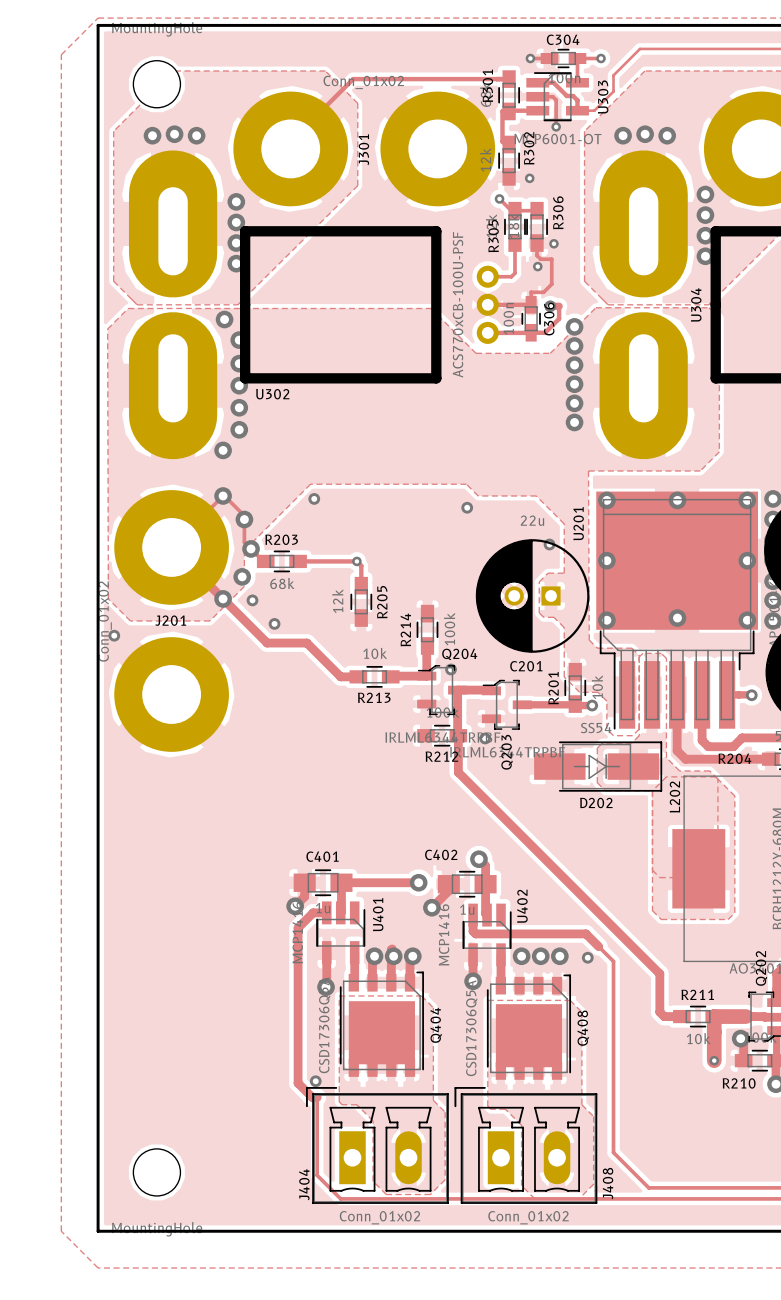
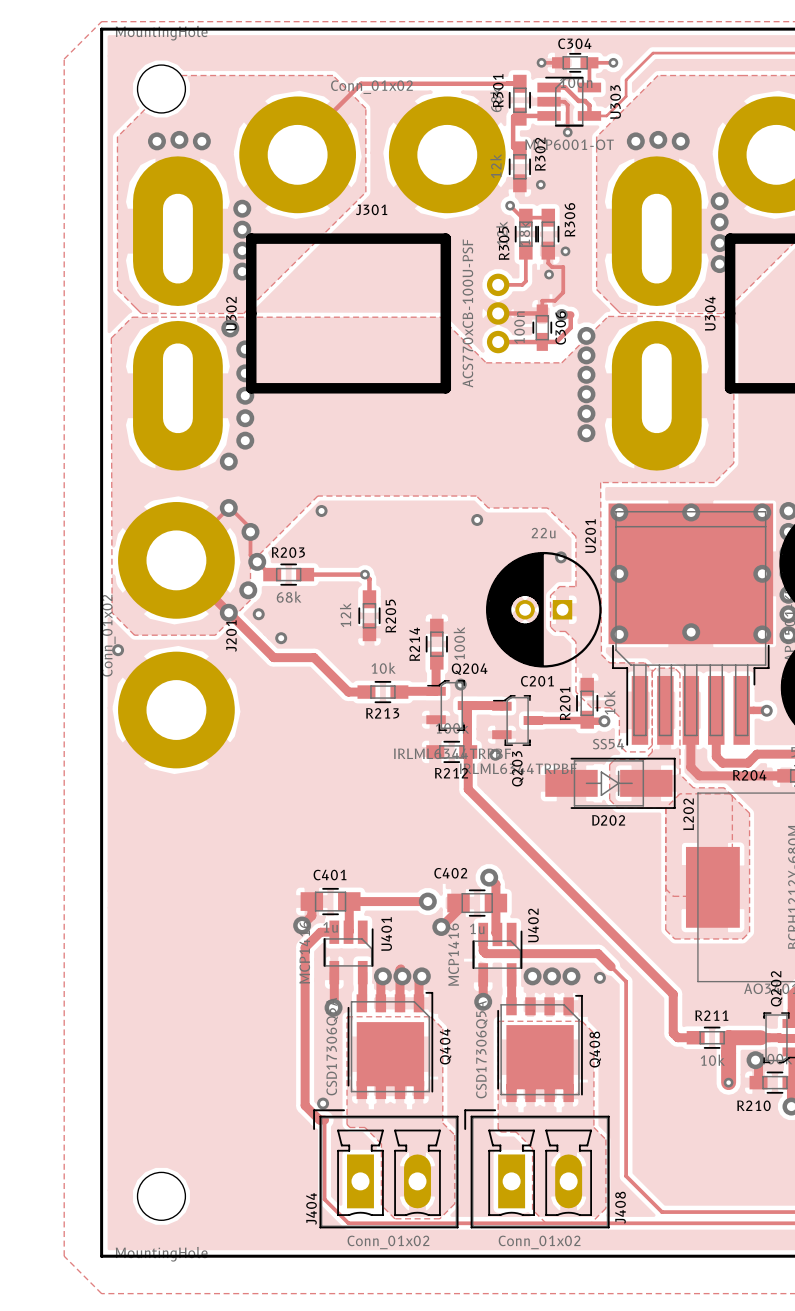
J301 name rotation: 0° (363, 149) -> 90° clockwise (371, 209)
J301 name position: J301 (363, 149) -> J301 (371, 209)
U302 name rotation: 0° (272, 394) -> 90° counterclockwise (231, 313)
U302 name position: U302 (272, 394) -> U302 (231, 313)
J201 name rotation: 0° (170, 620) -> 90° counterclockwise (231, 636)
J201 name position: J201 (170, 620) -> J201 (231, 636)

